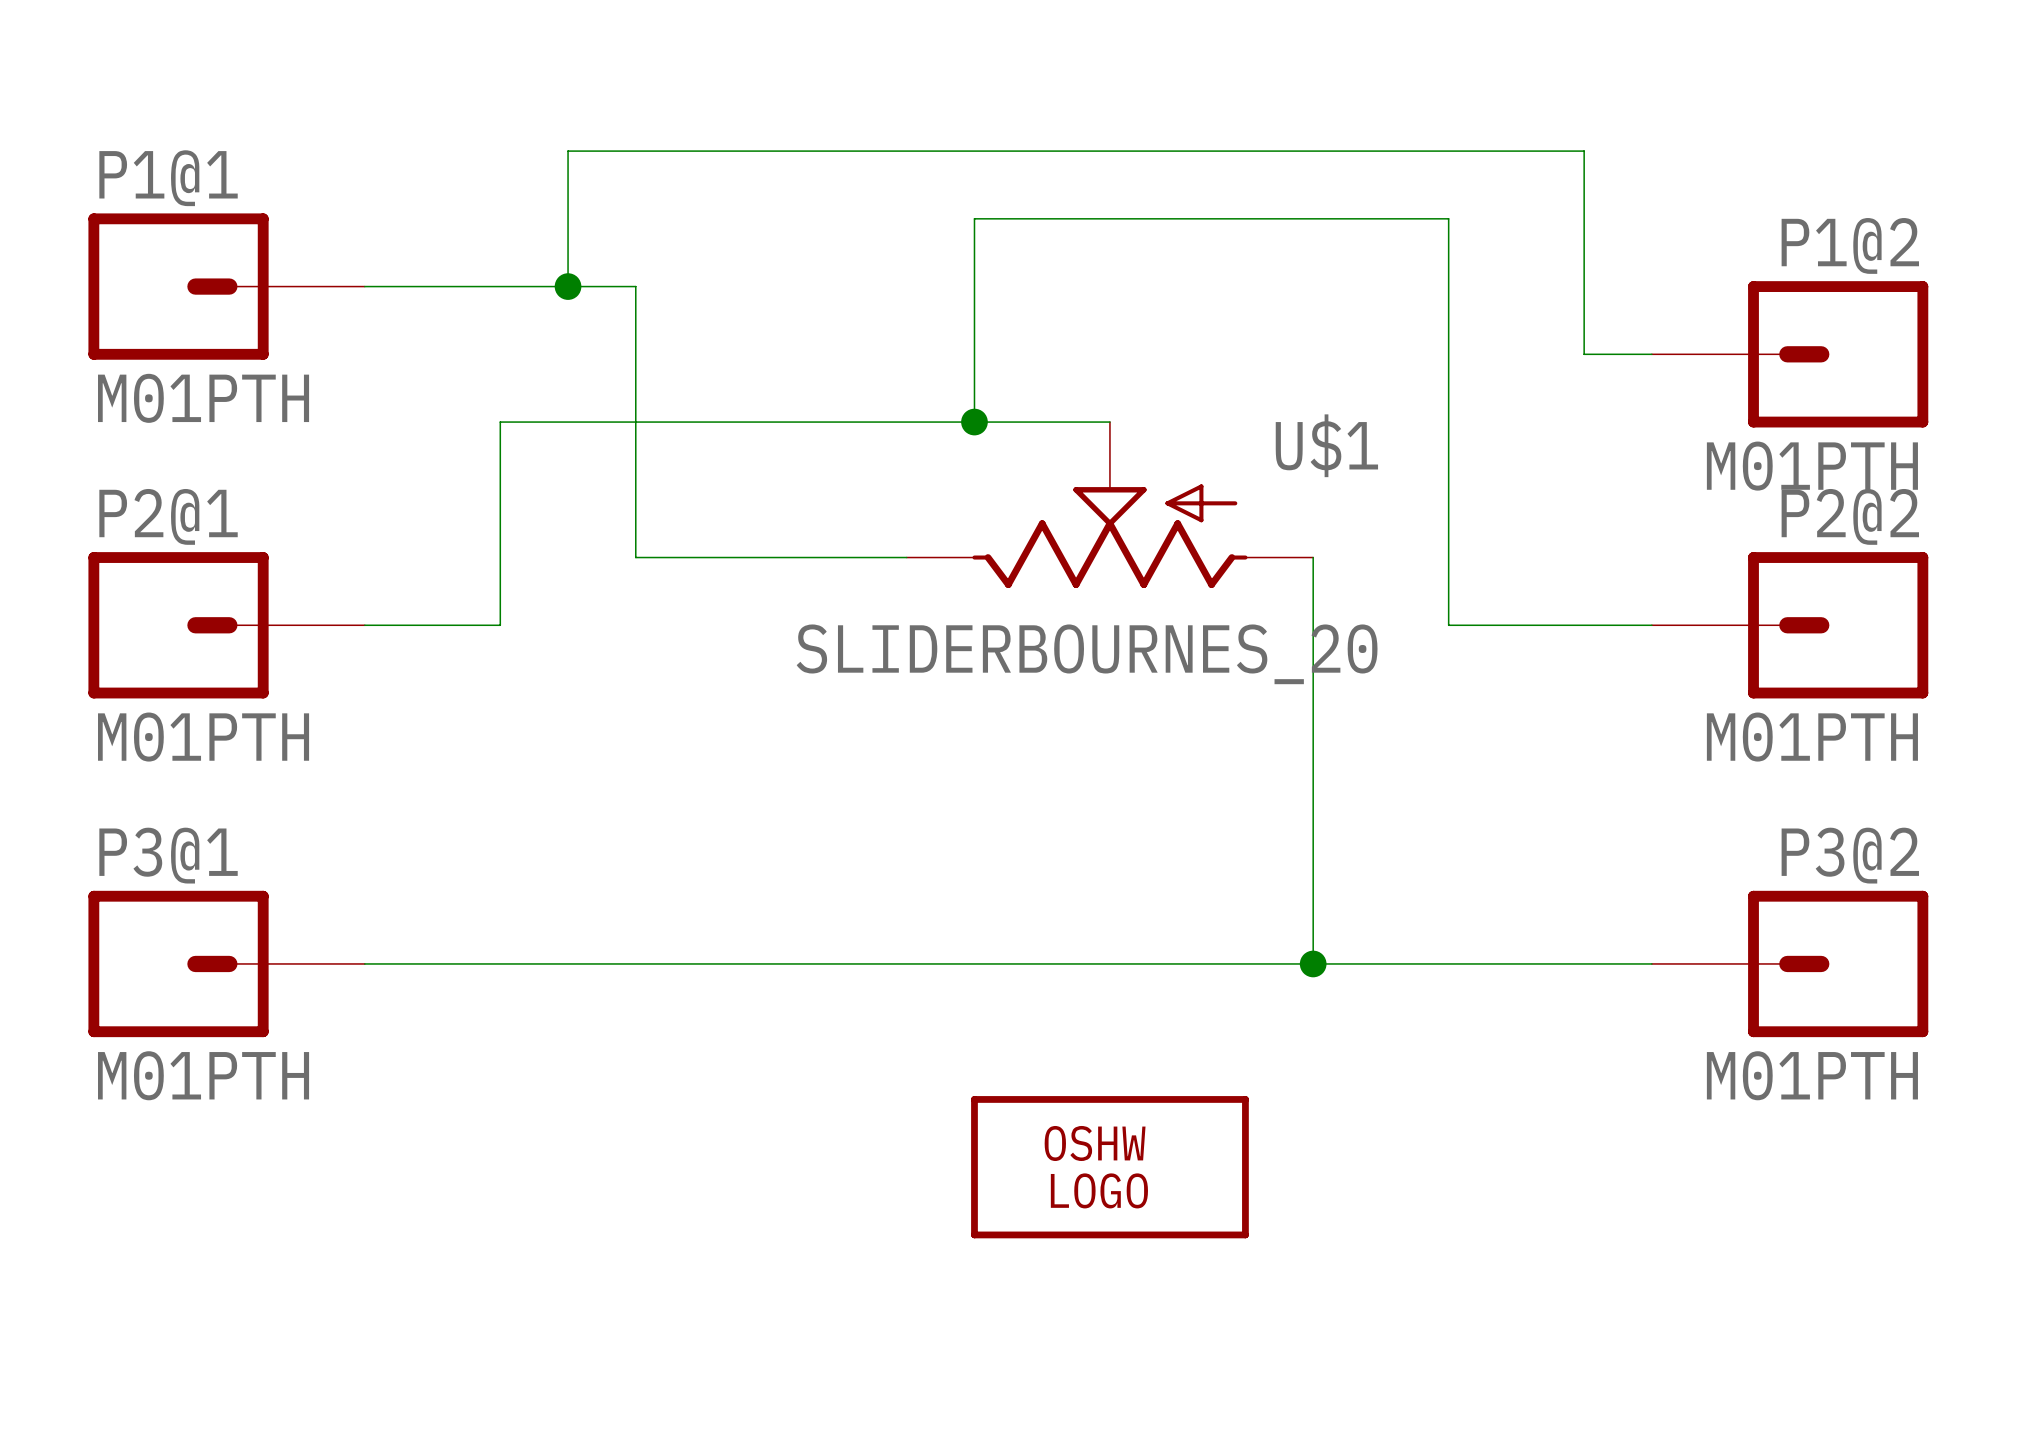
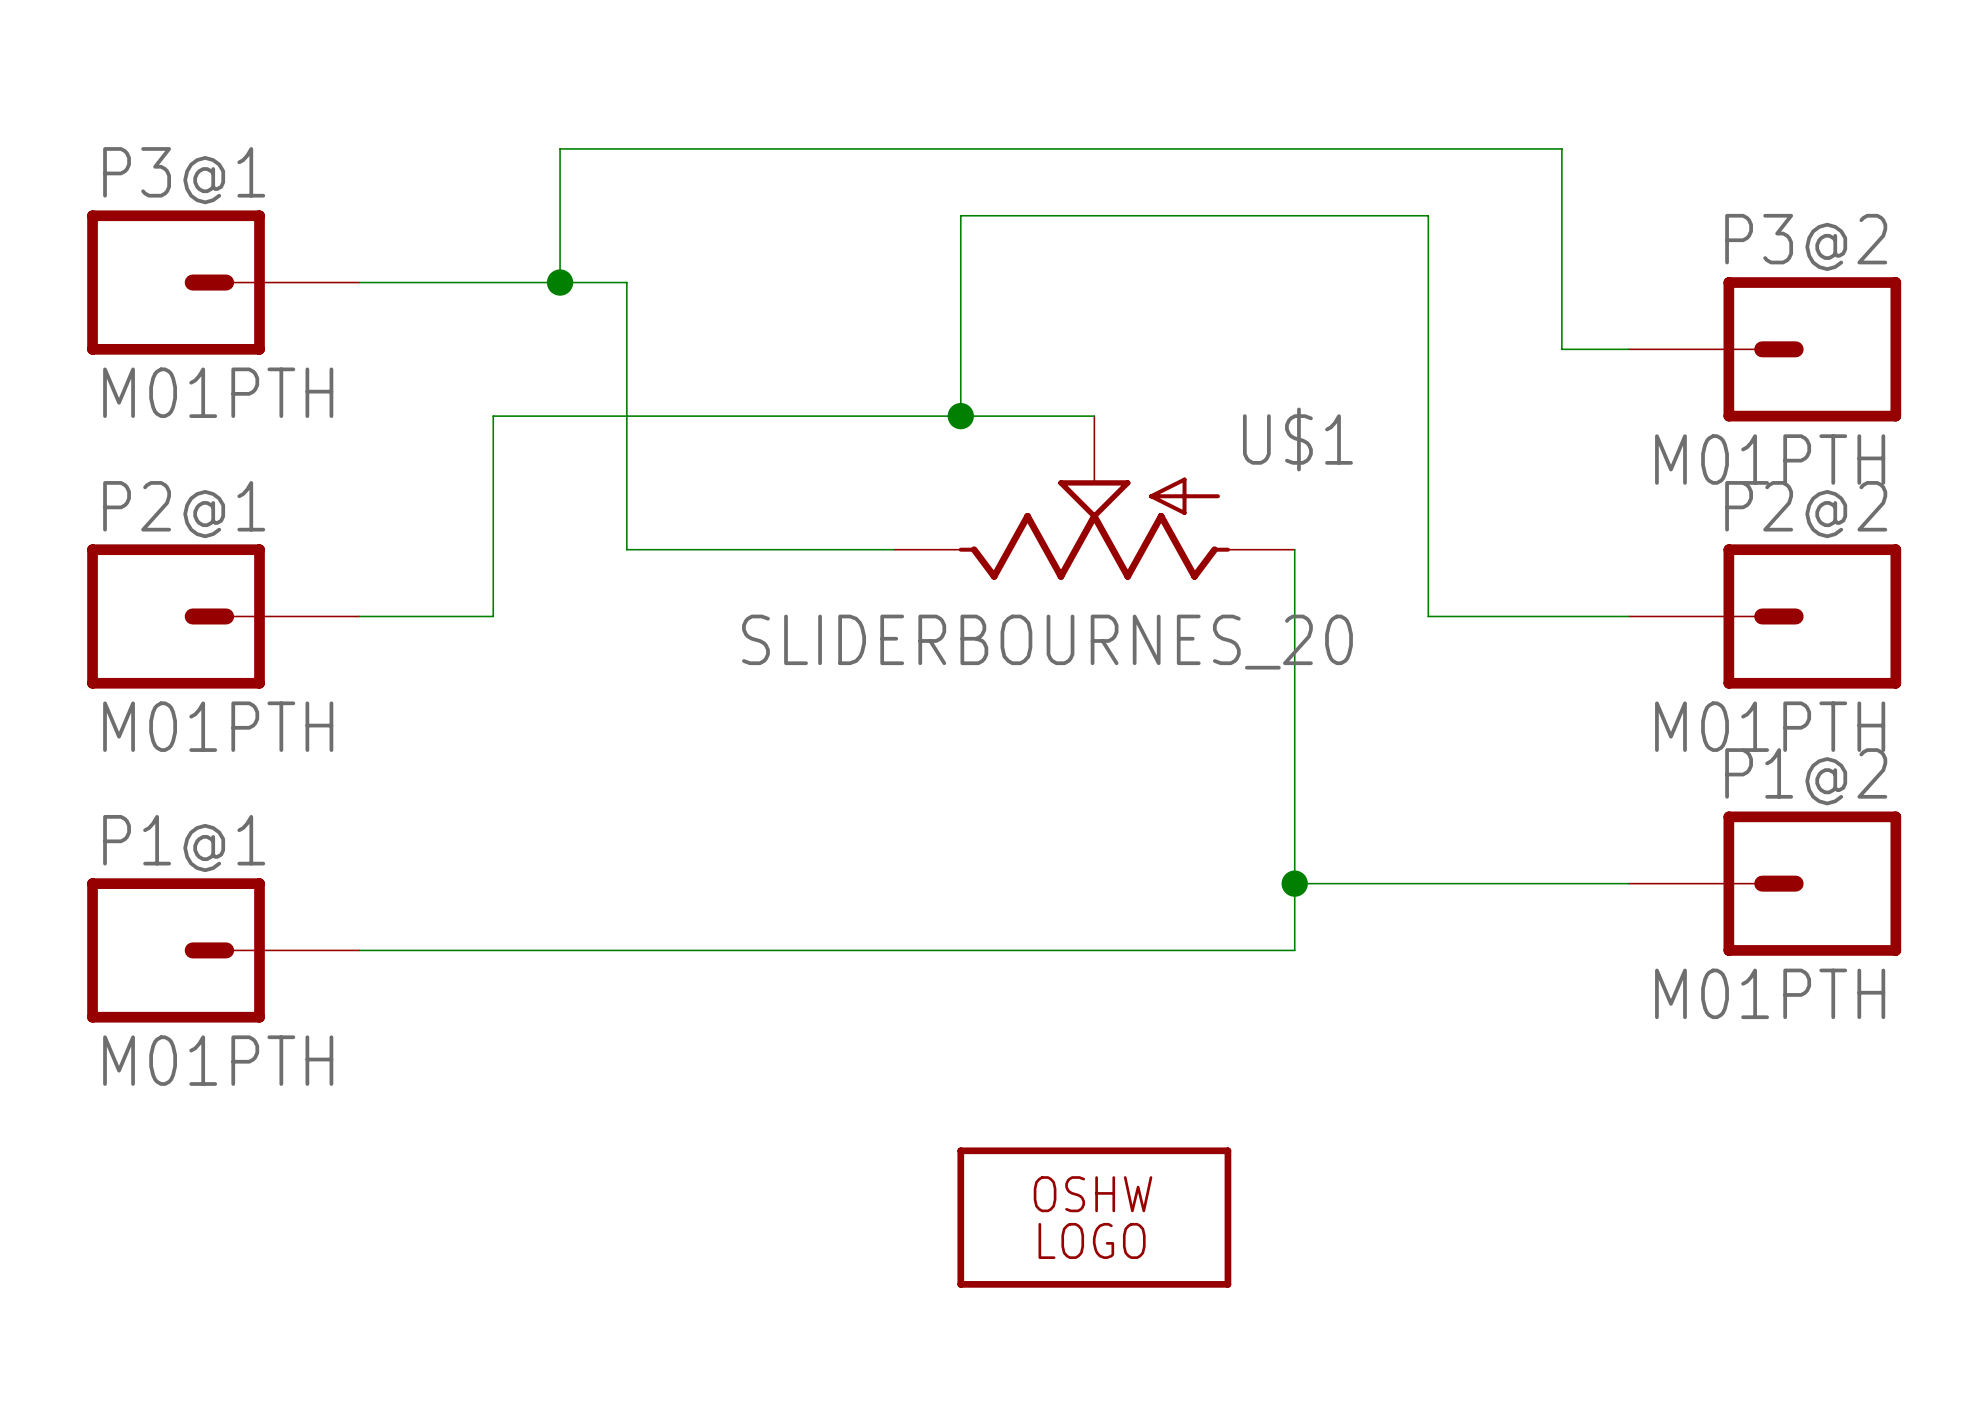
P1@1 name: P1@1 (168, 178) -> P3@1 (184, 175)
P1@2 name: P1@2 (1850, 245) -> P3@2 (1806, 242)
P3@1 name: P3@1 (168, 855) -> P1@1 (184, 843)
P1@2: none -> M01PTH (1764, 883)
wire: (1313, 963) (1651, 963) -> (1294, 883) (1628, 883)
junction position: (1313, 963) -> (1294, 883)
P3@2: M01PTH (1790, 963) -> none
part position: (1109, 1167) -> (1094, 1217)

